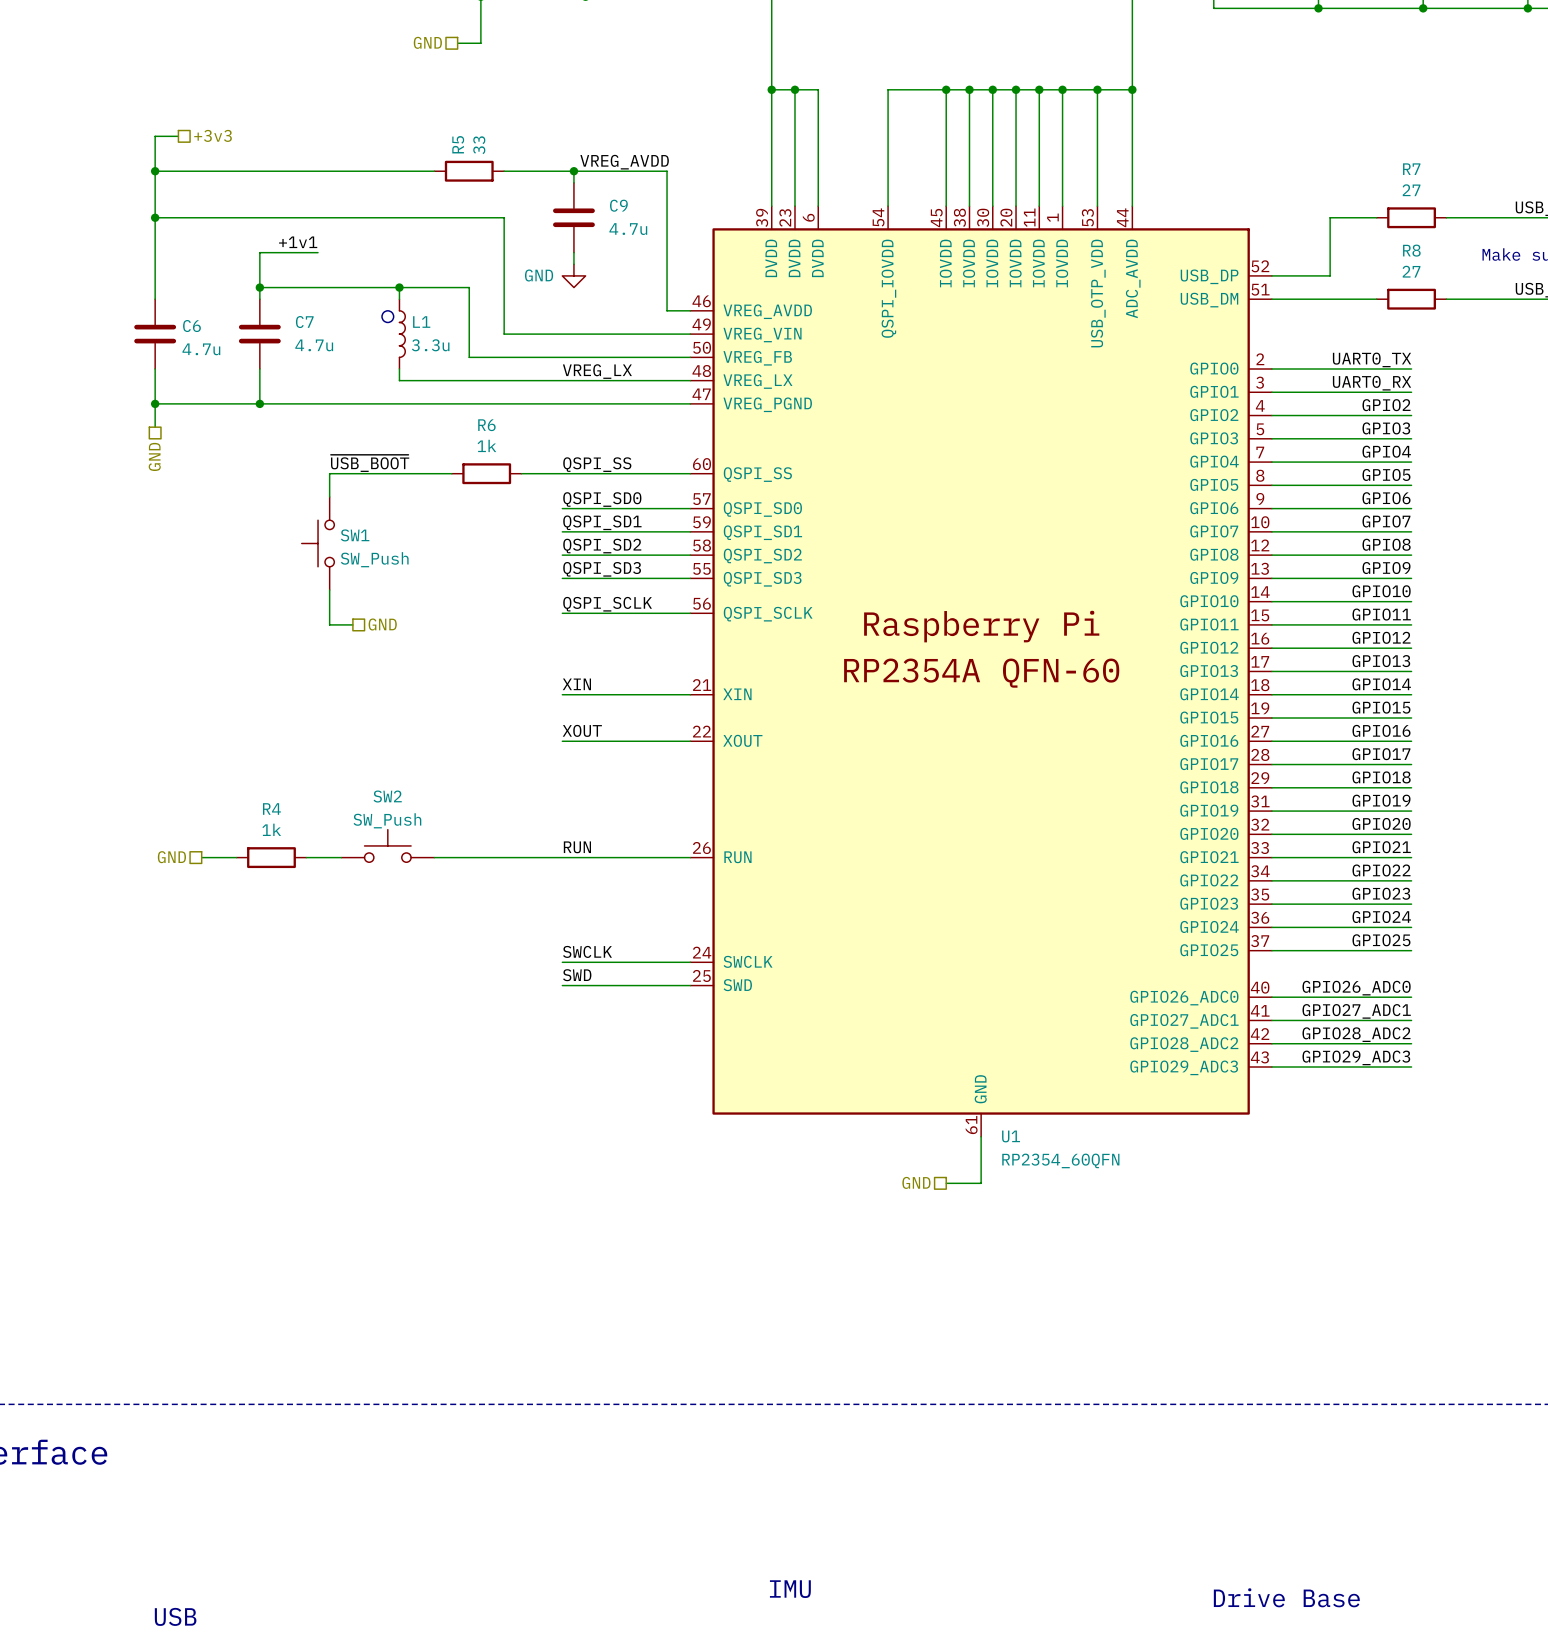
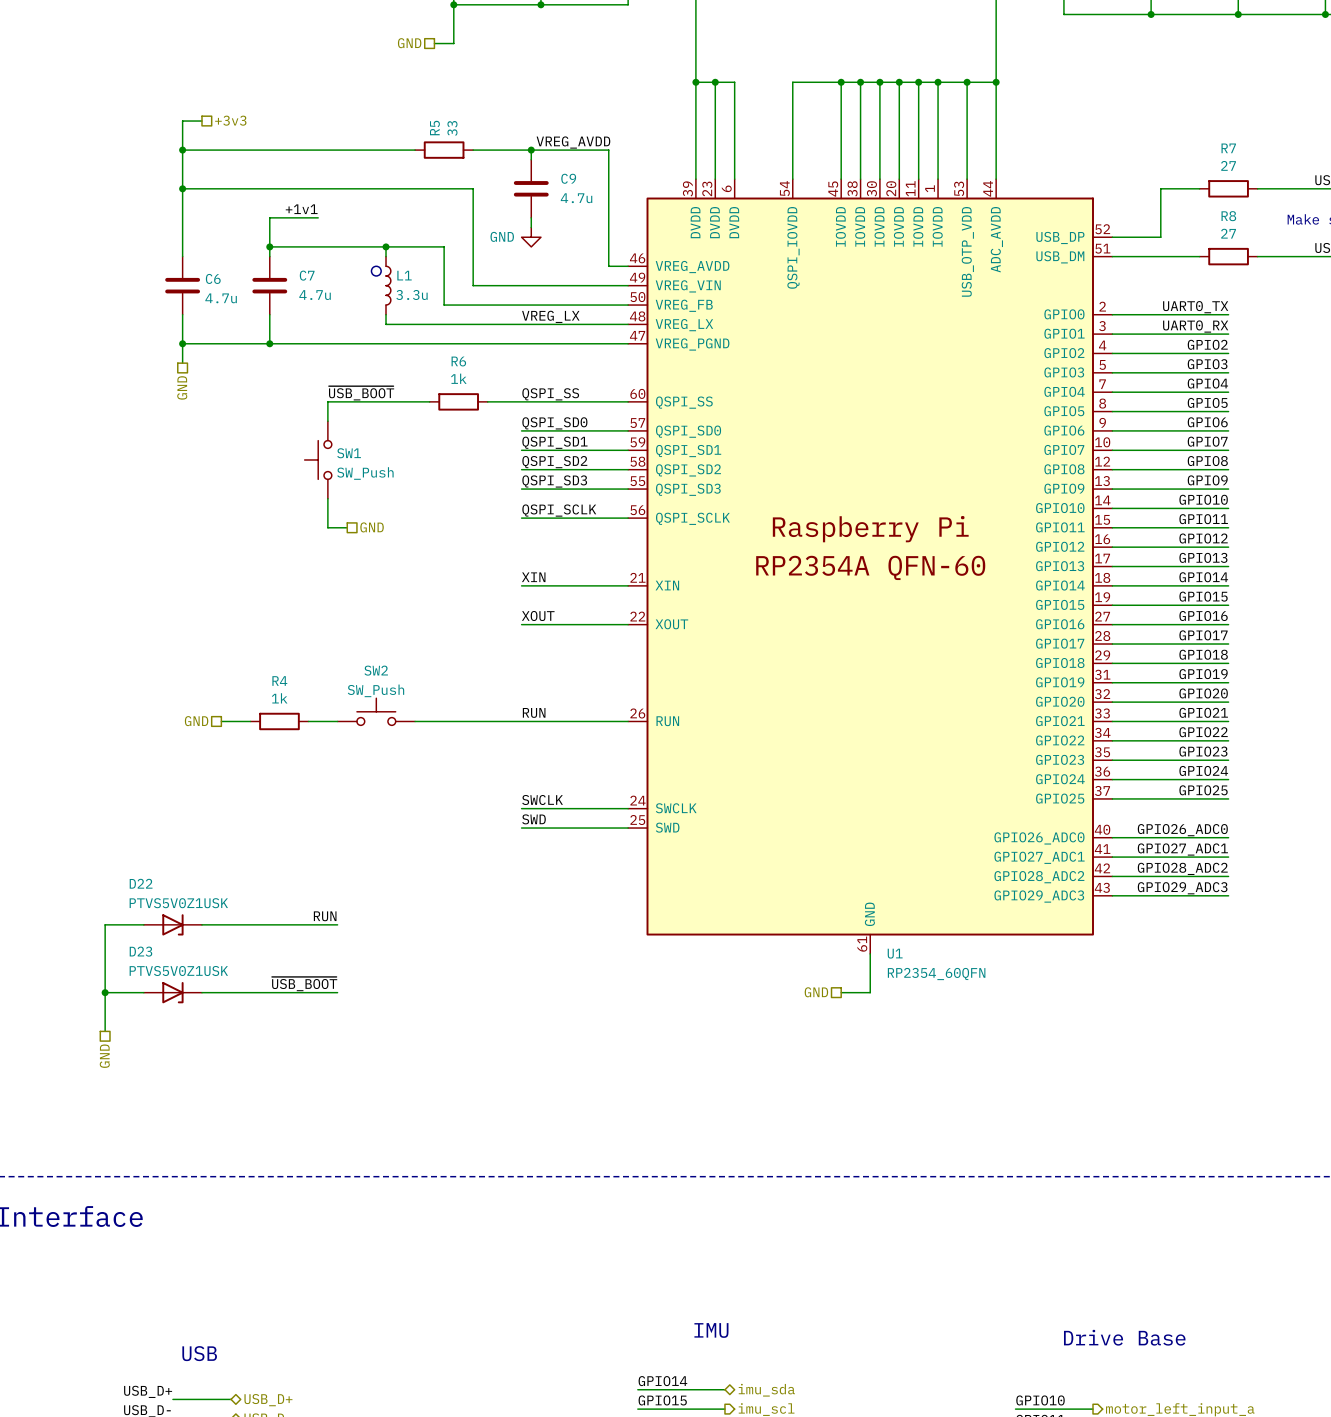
label: none -> RUN (325, 916)
wire: none -> (143, 924) (105, 924) (105, 1031)
D22: none -> PTVS5V0Z1USK (172, 924)
wire: none -> (201, 924) (337, 924)
label: none -> ~{USB_BOOT} (304, 984)
wire: none -> (105, 992) (143, 992)
junction: none -> (105, 992)
D23: none -> PTVS5V0Z1USK (172, 992)
wire: none -> (201, 992) (337, 992)
hierarchical label: none -> GND (104, 1056)

